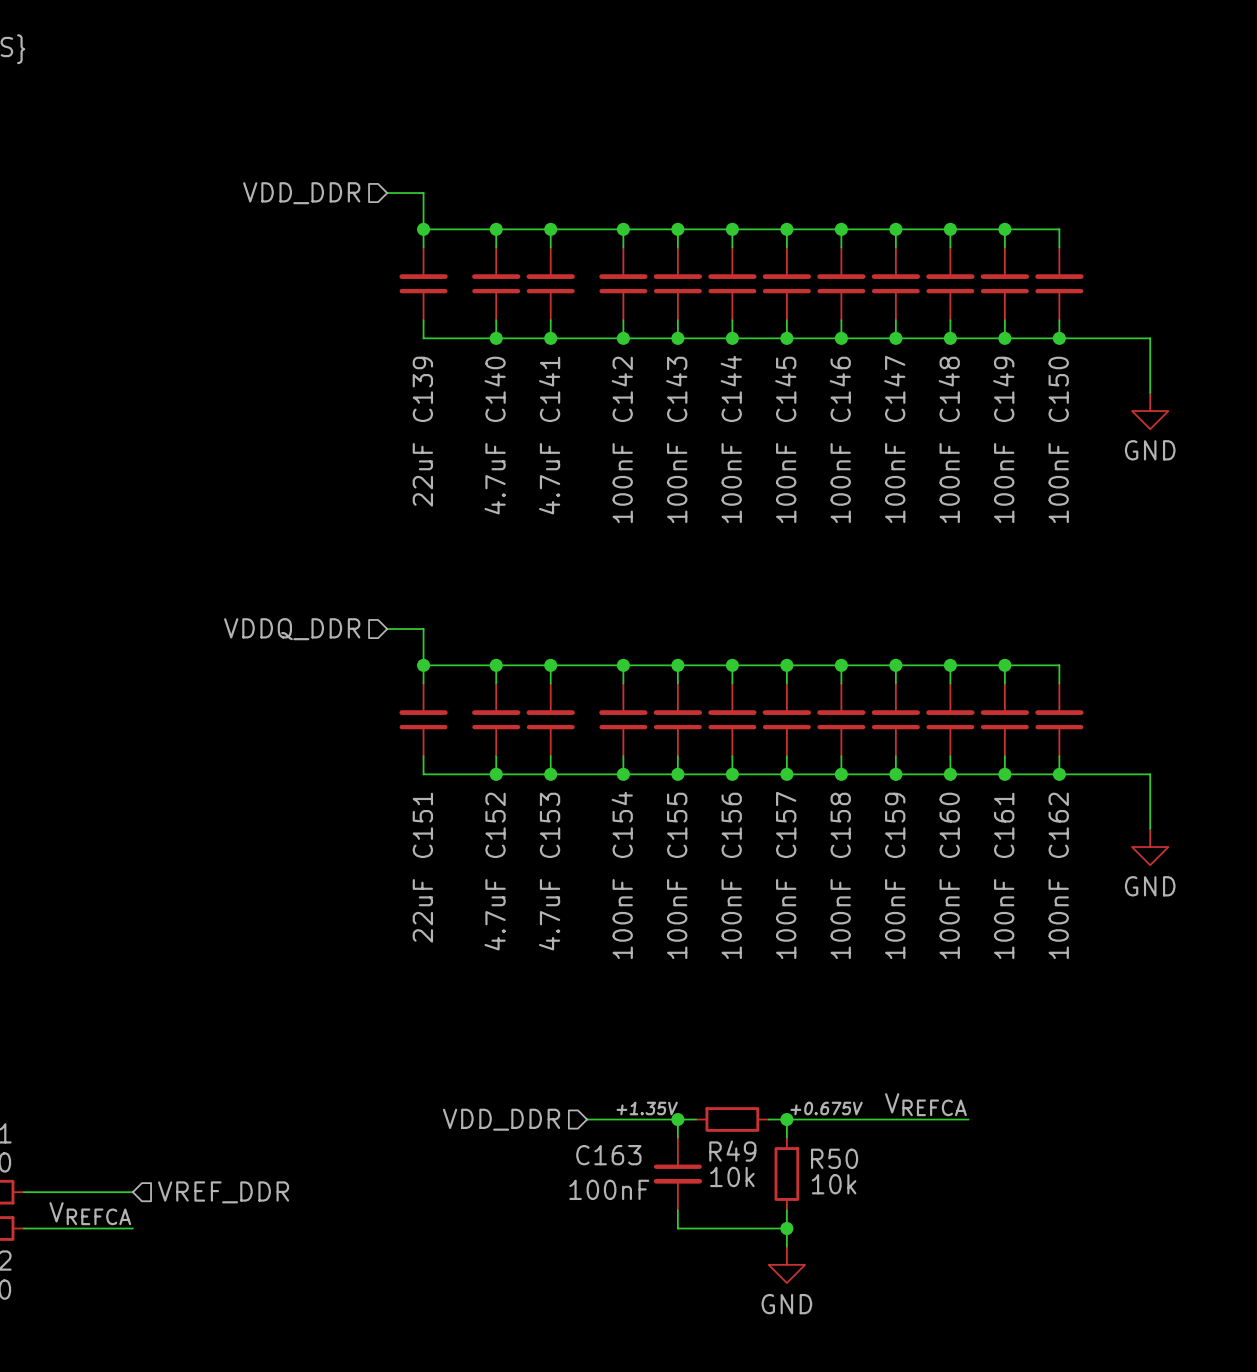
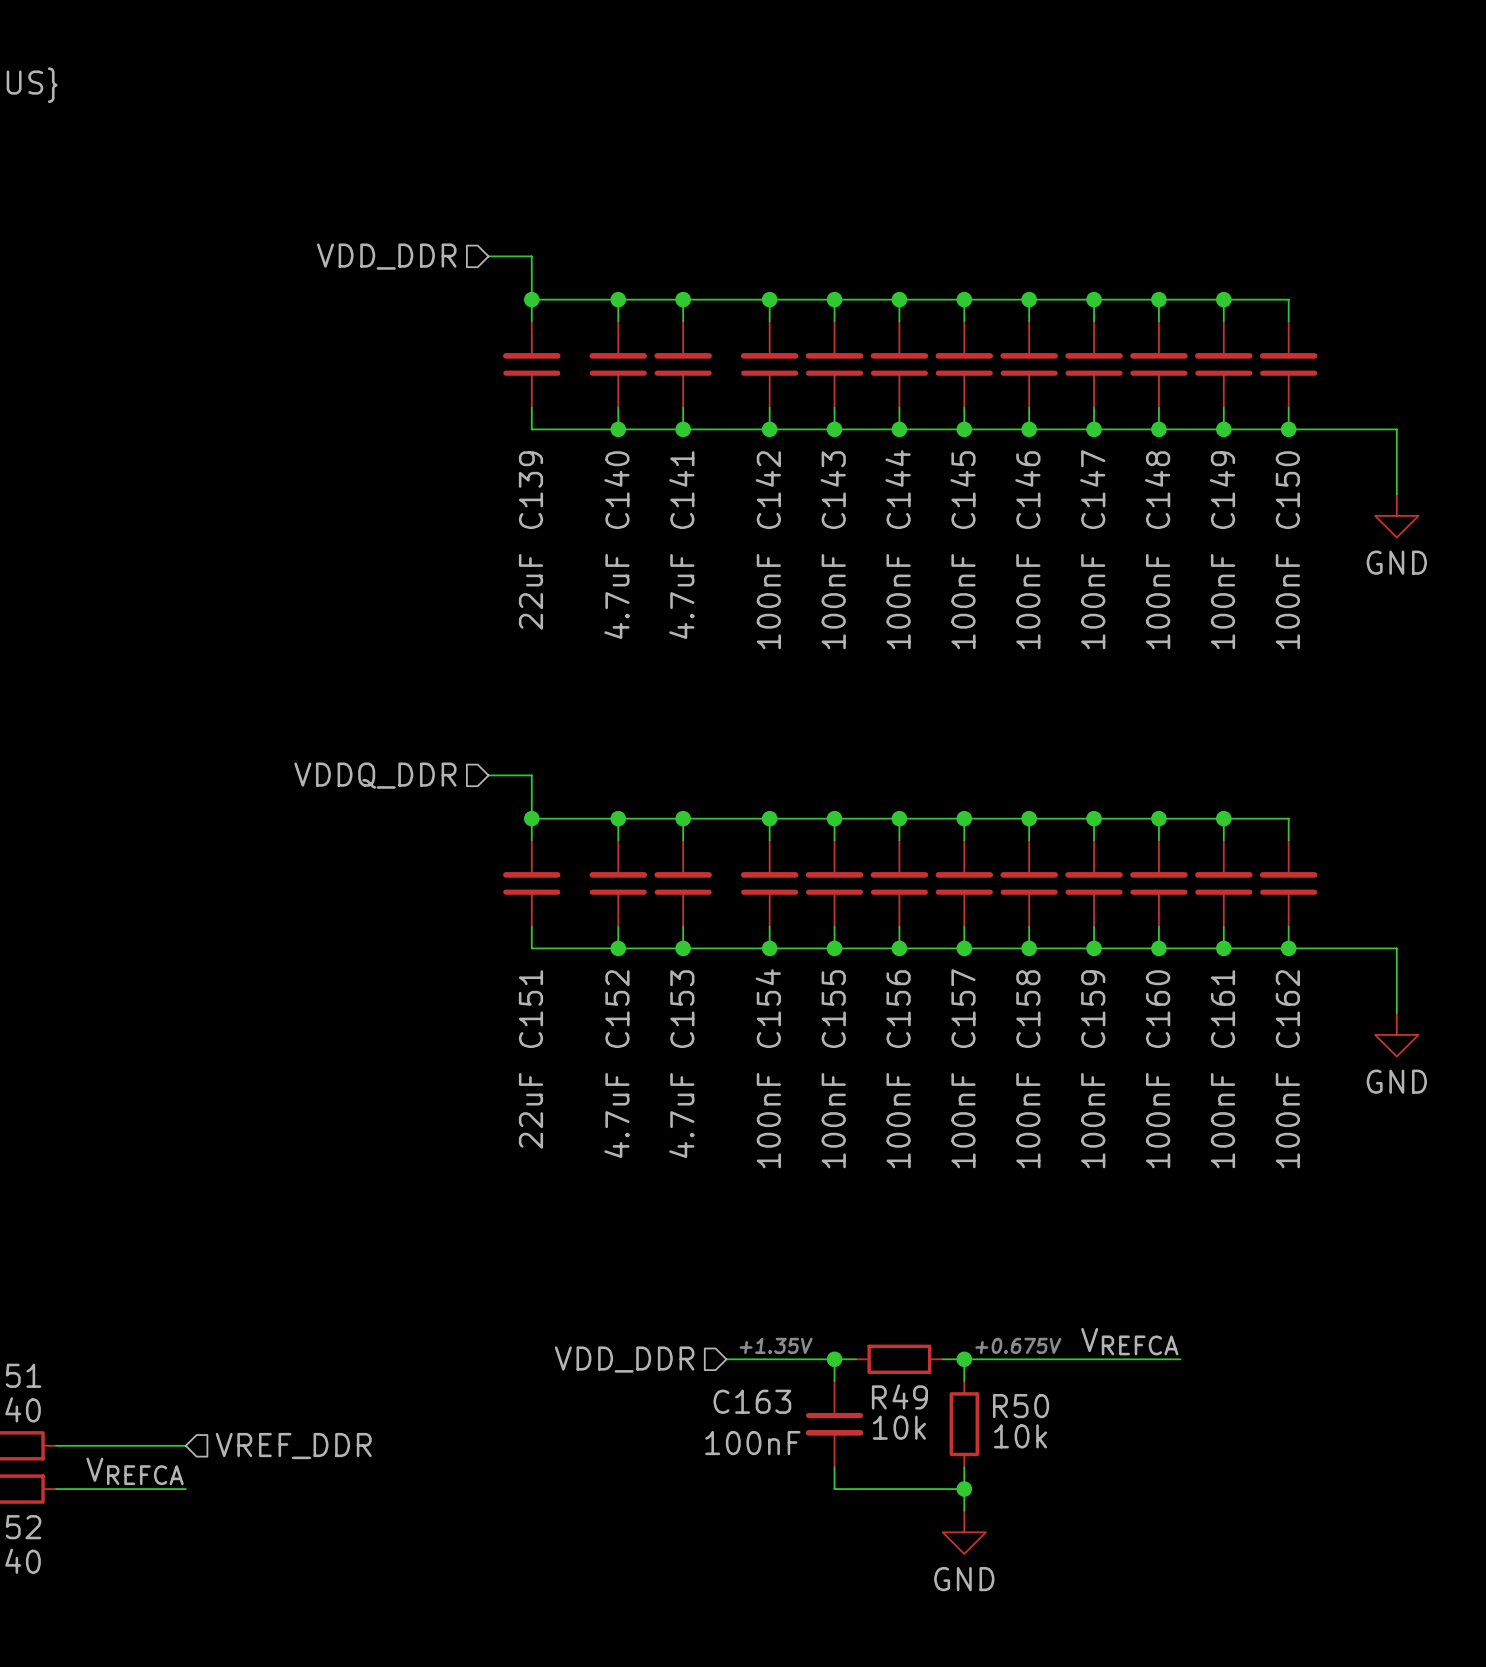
text: none -> +1.35V (776, 1345)
label: +1.35V (647, 1108) -> none
label: +0.675V (826, 1108) -> none
text: none -> +0.675V (1018, 1345)

